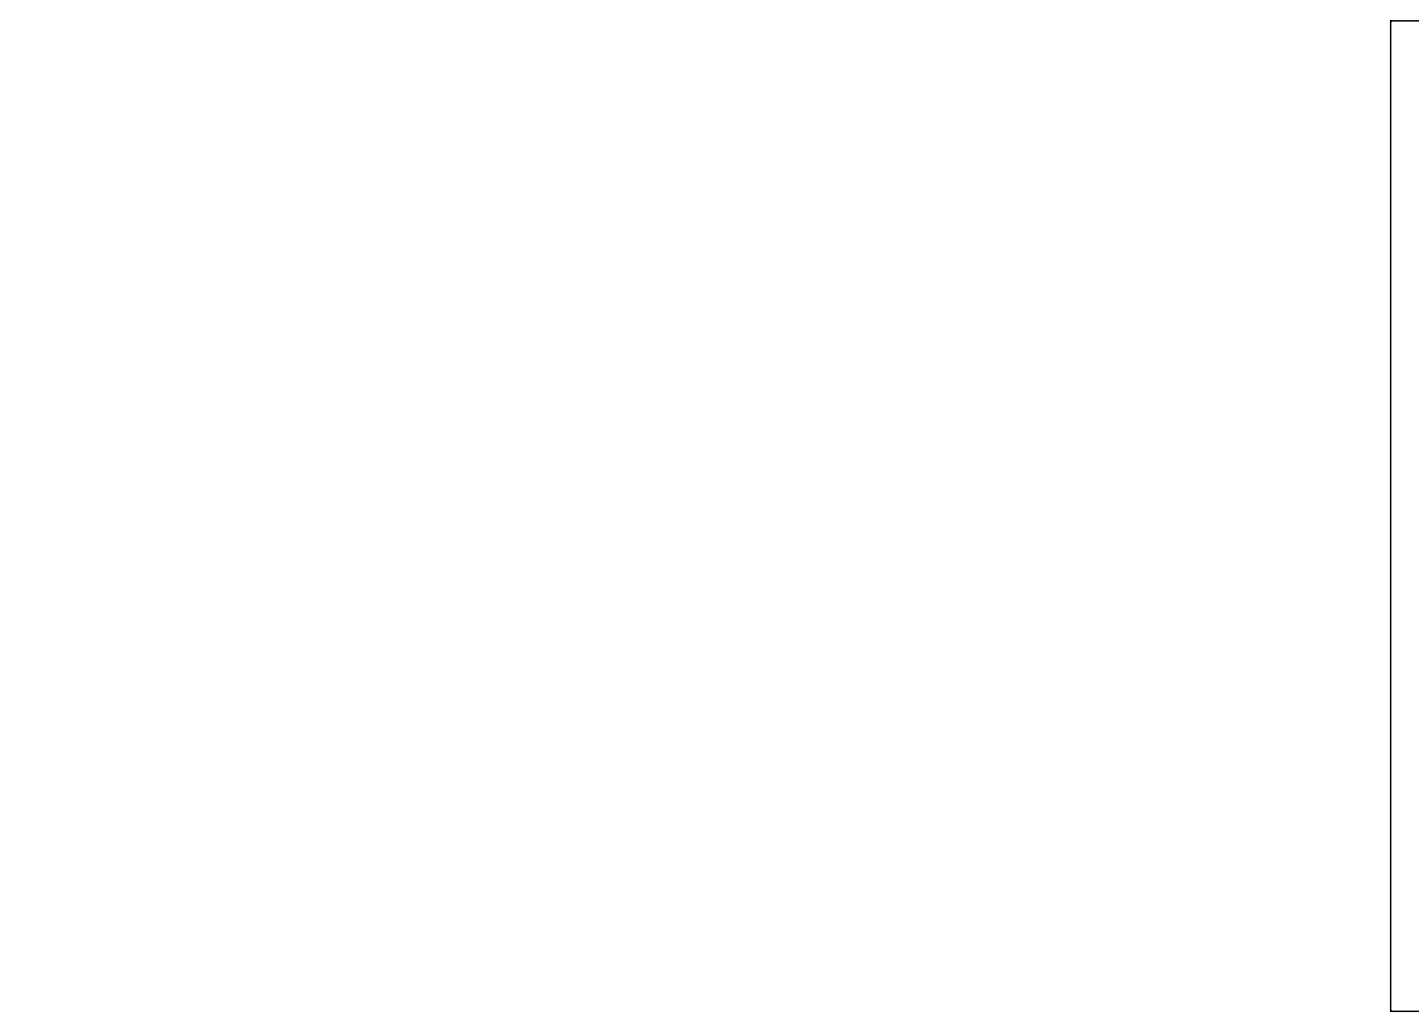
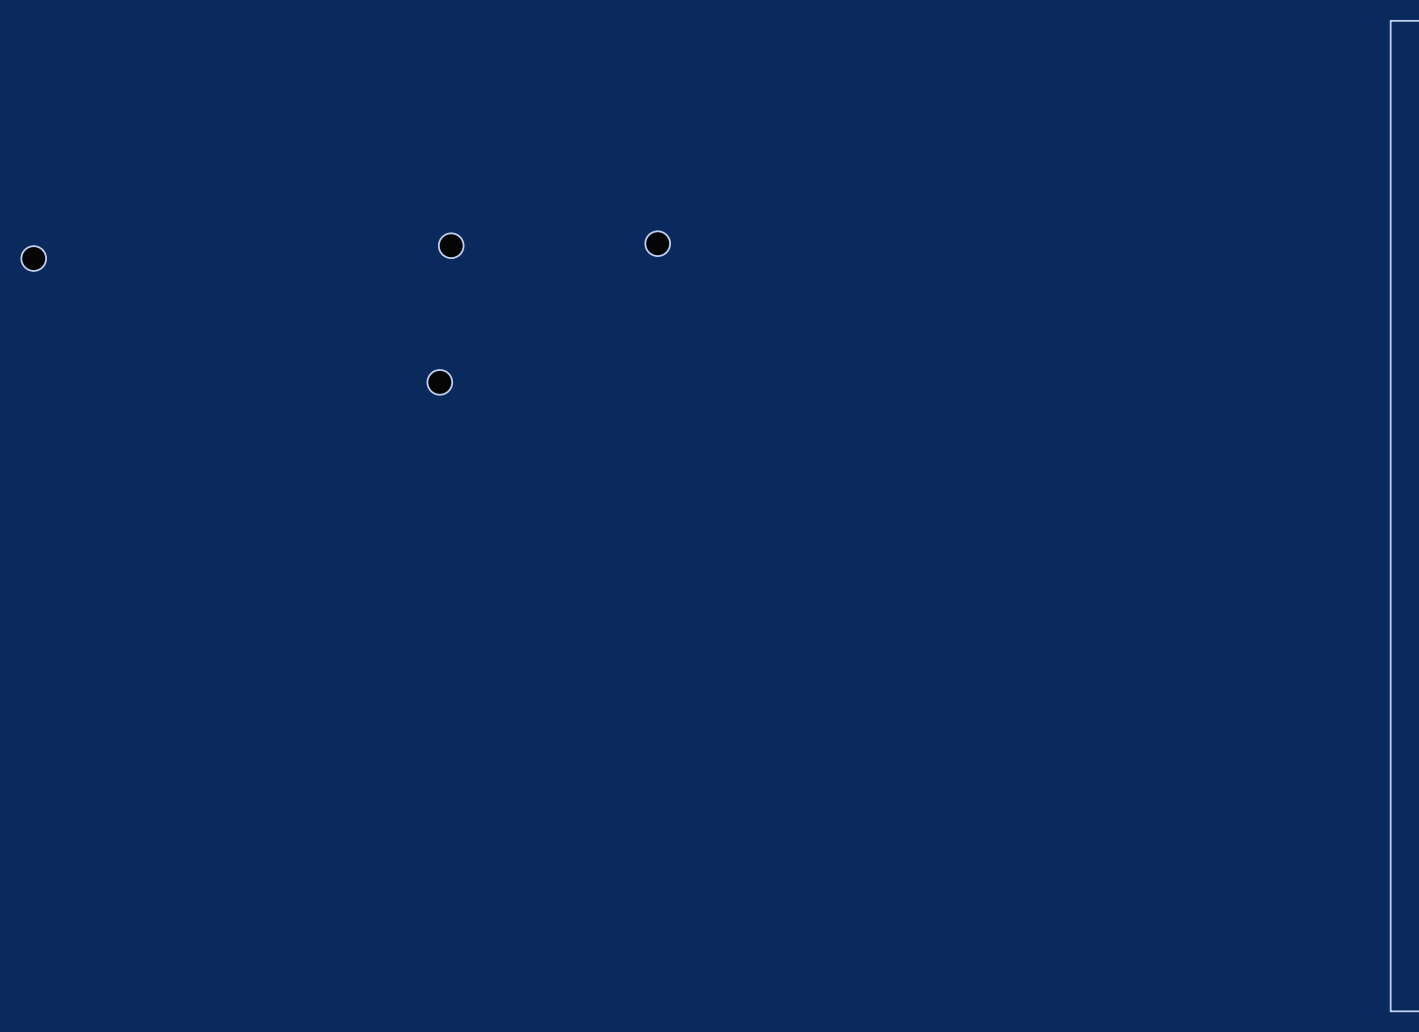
part: none -> (657, 243)
part: none -> (451, 245)
part: none -> (33, 258)
part: none -> (439, 382)

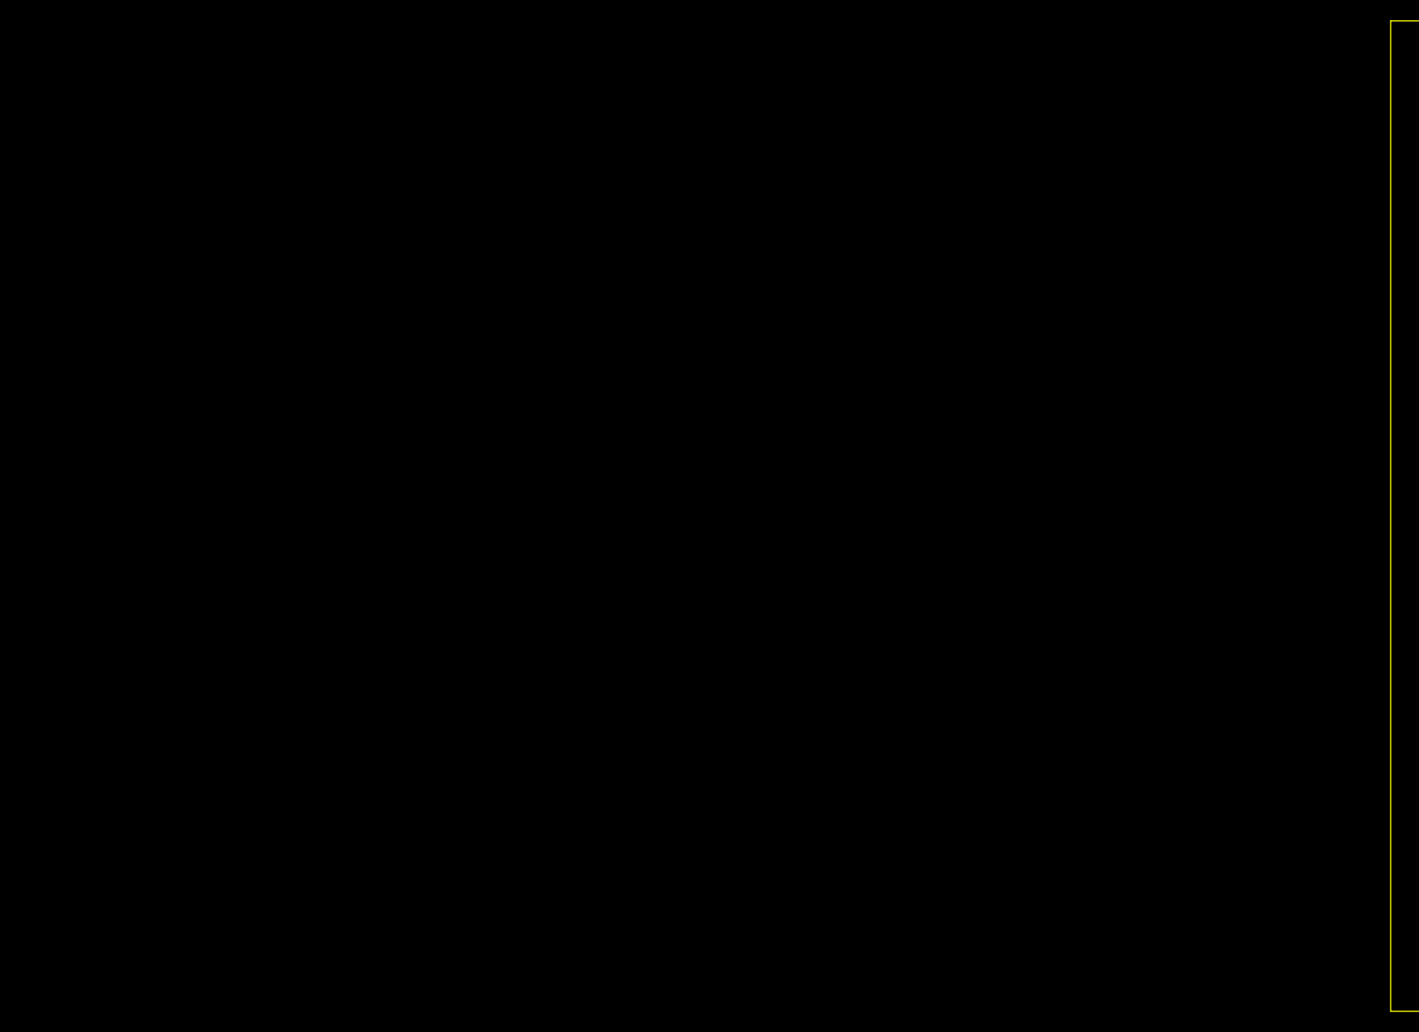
part: (657, 243) -> none
part: (451, 245) -> none
part: (33, 258) -> none
part: (439, 382) -> none

